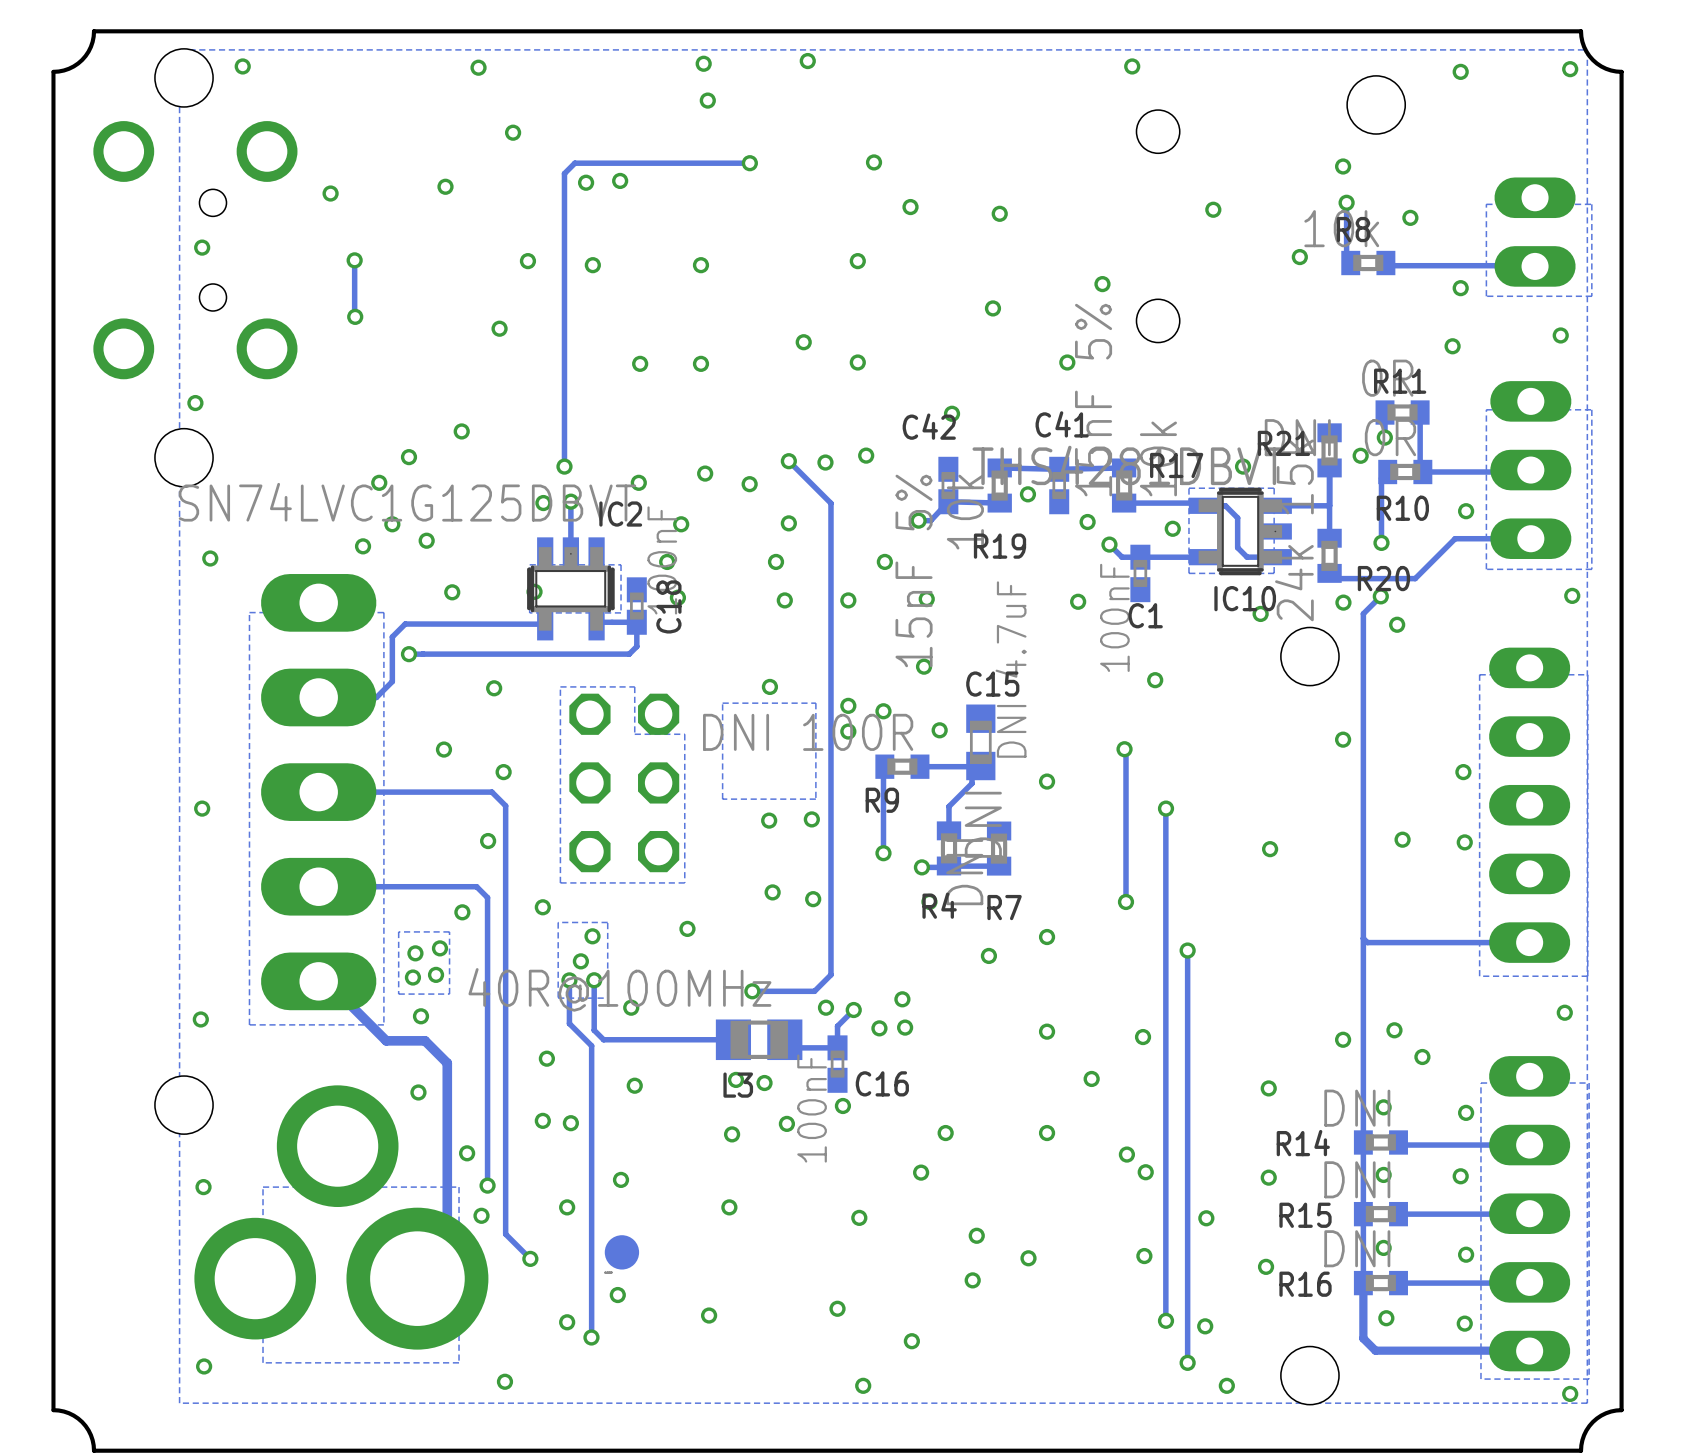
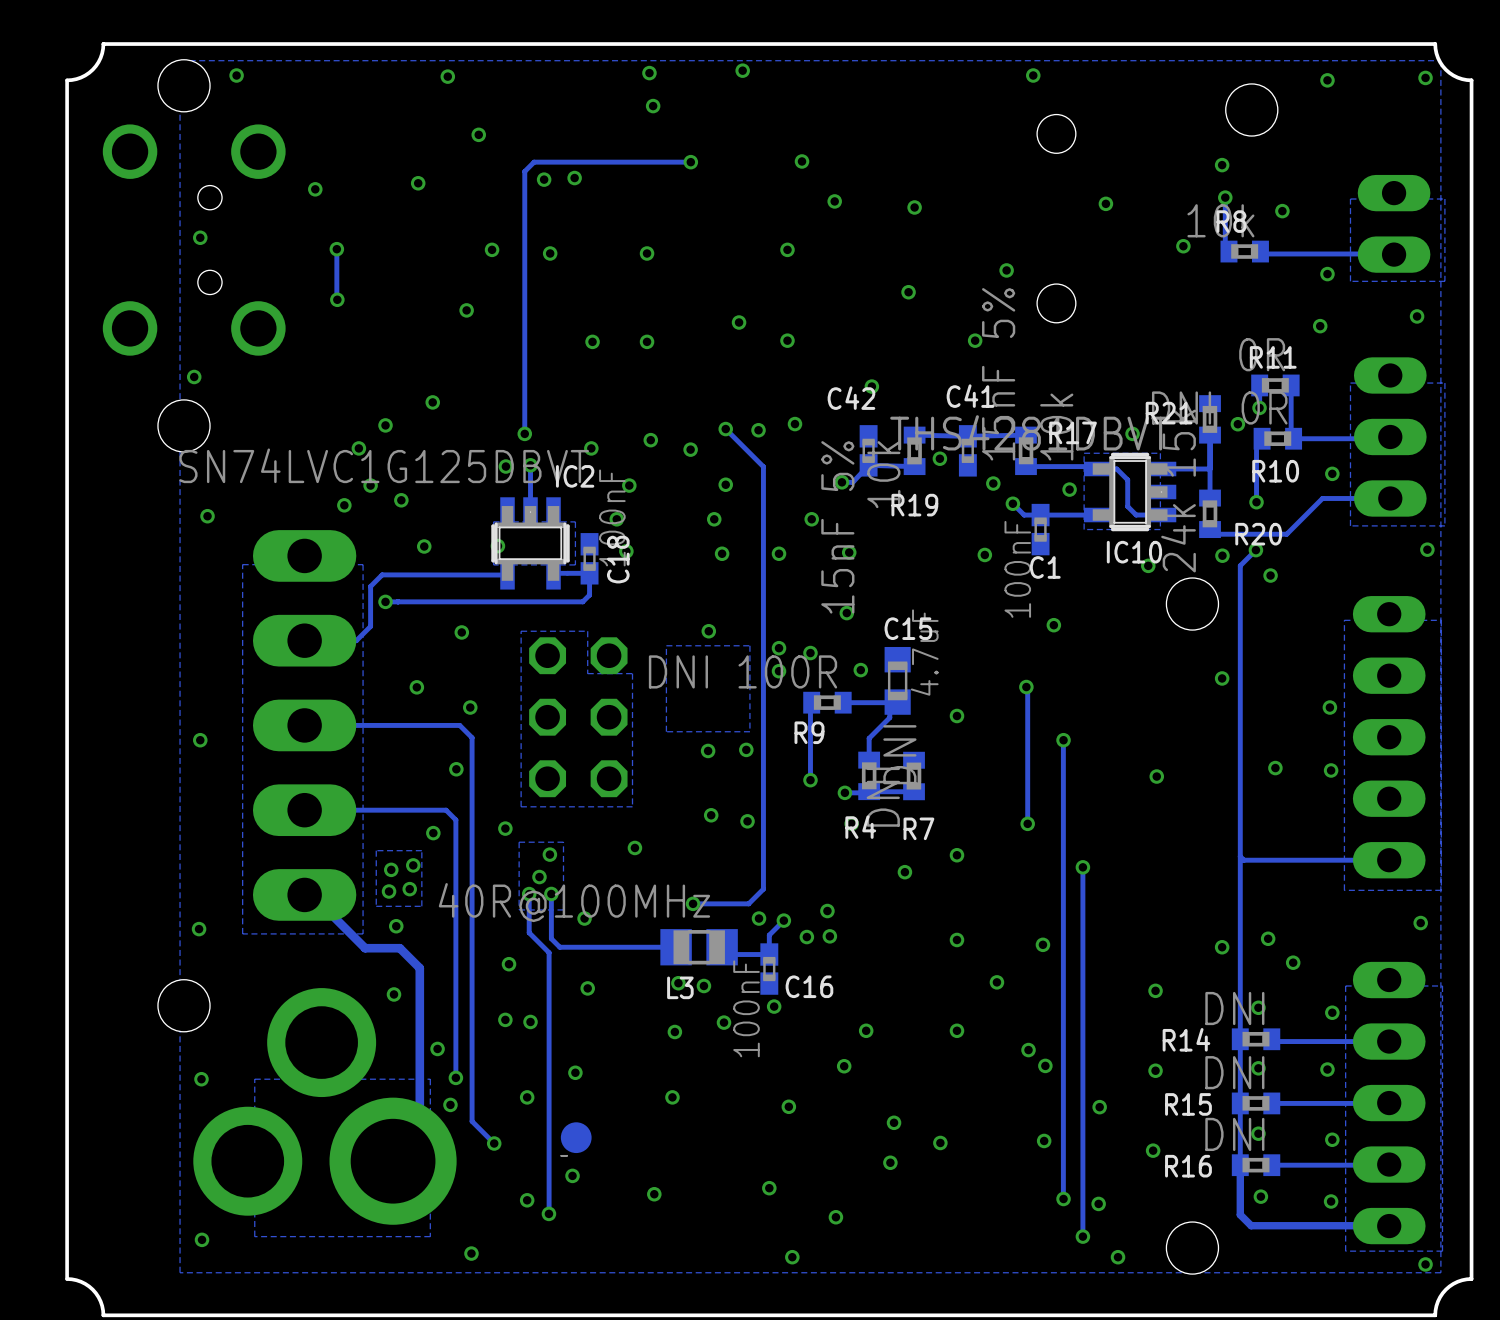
C15 value: DNI 4.7uF (1011, 669) -> 4.7uF (924, 652)

